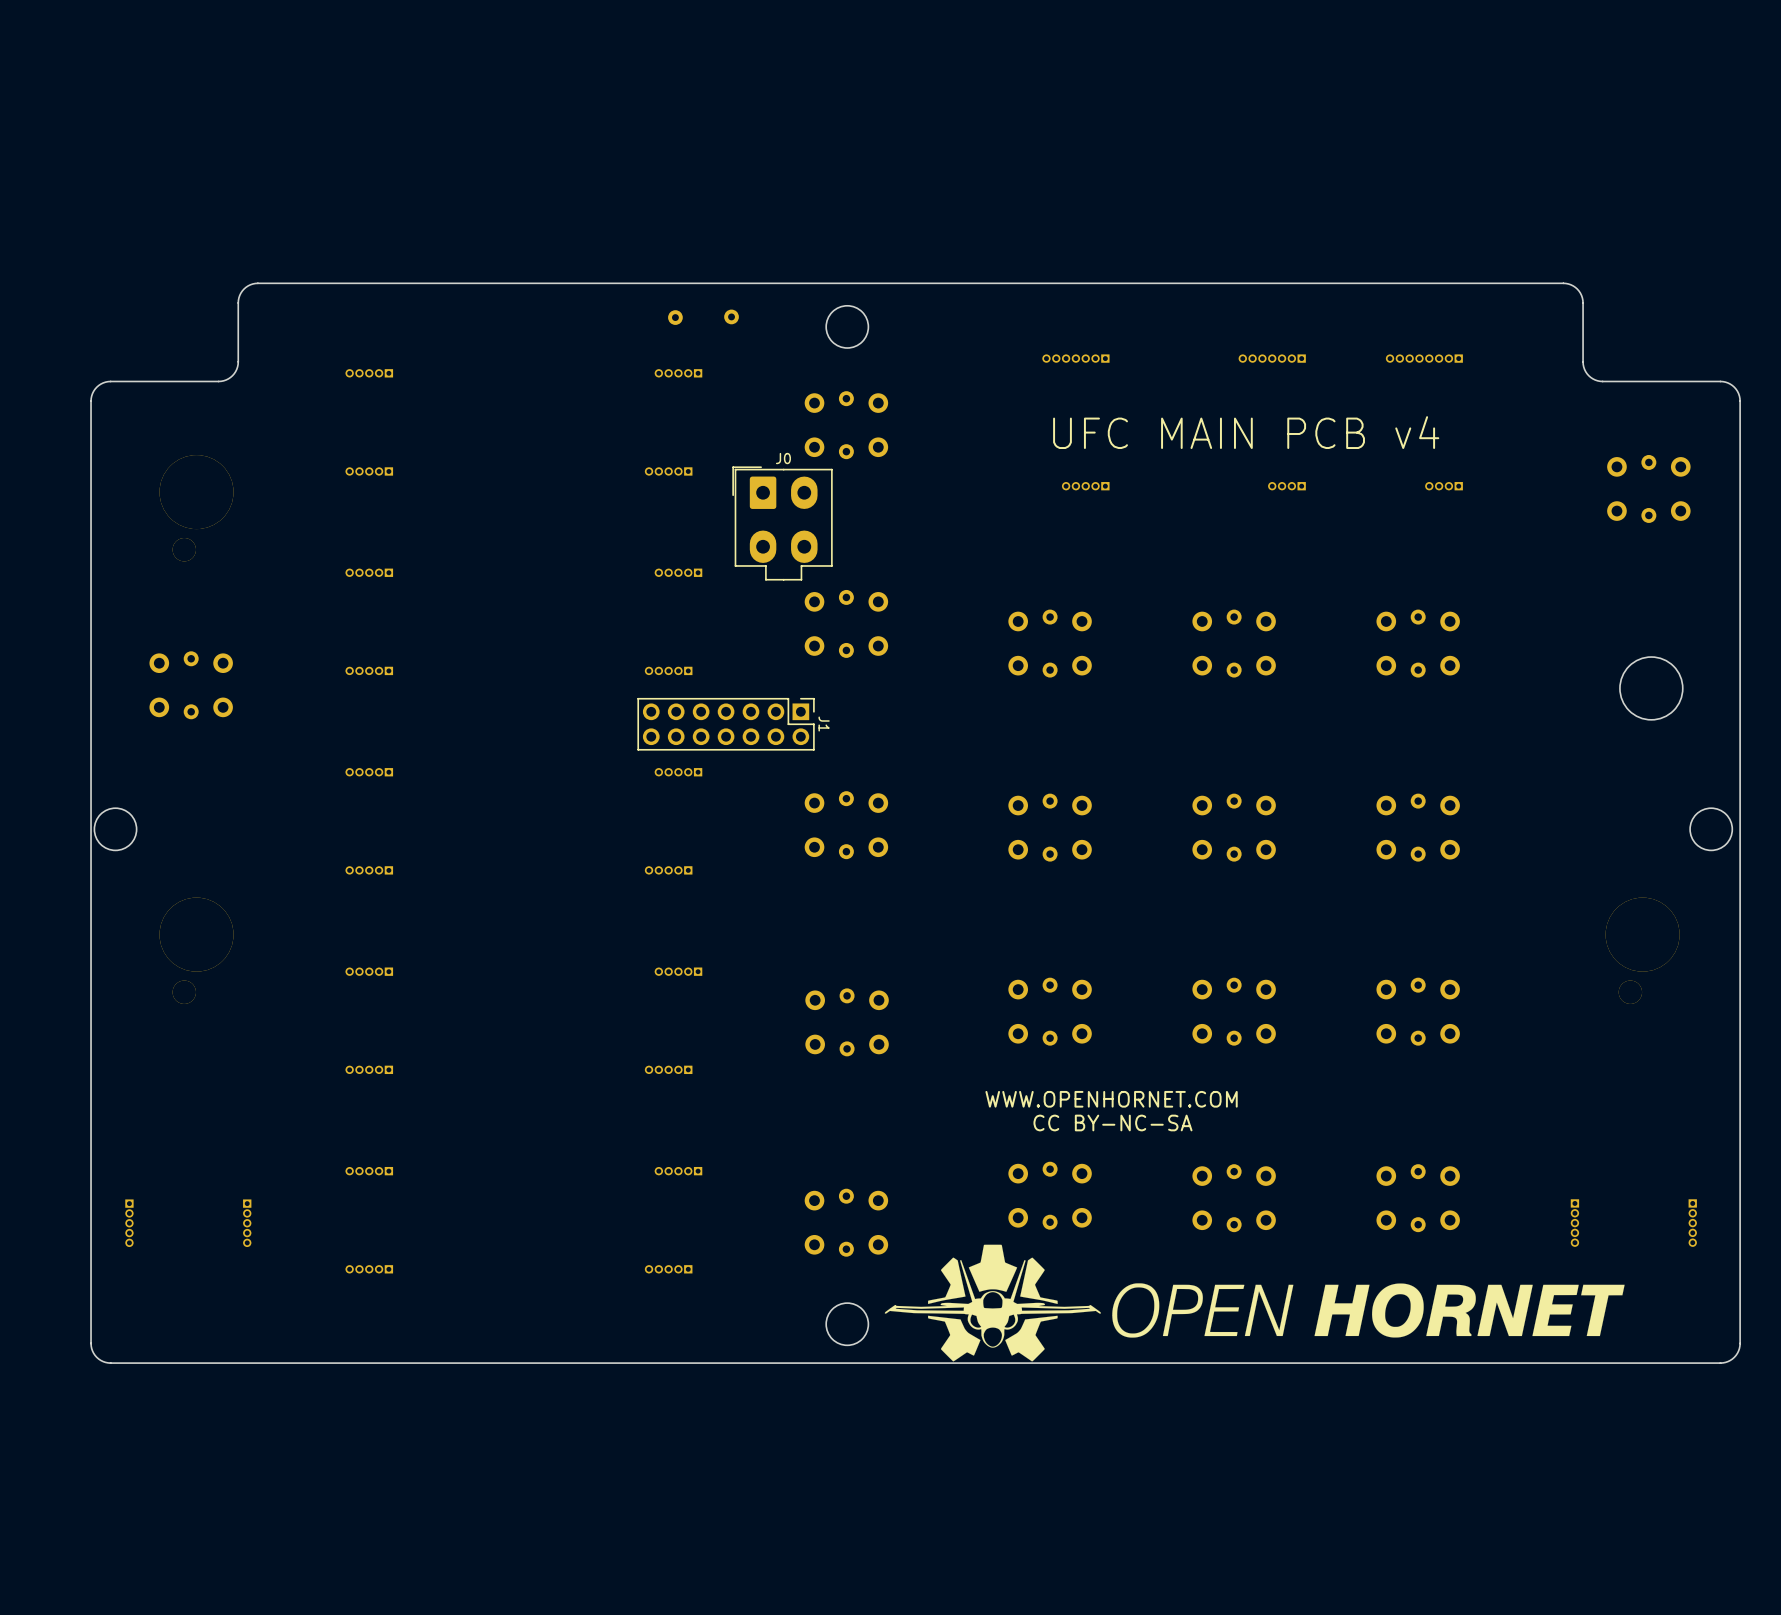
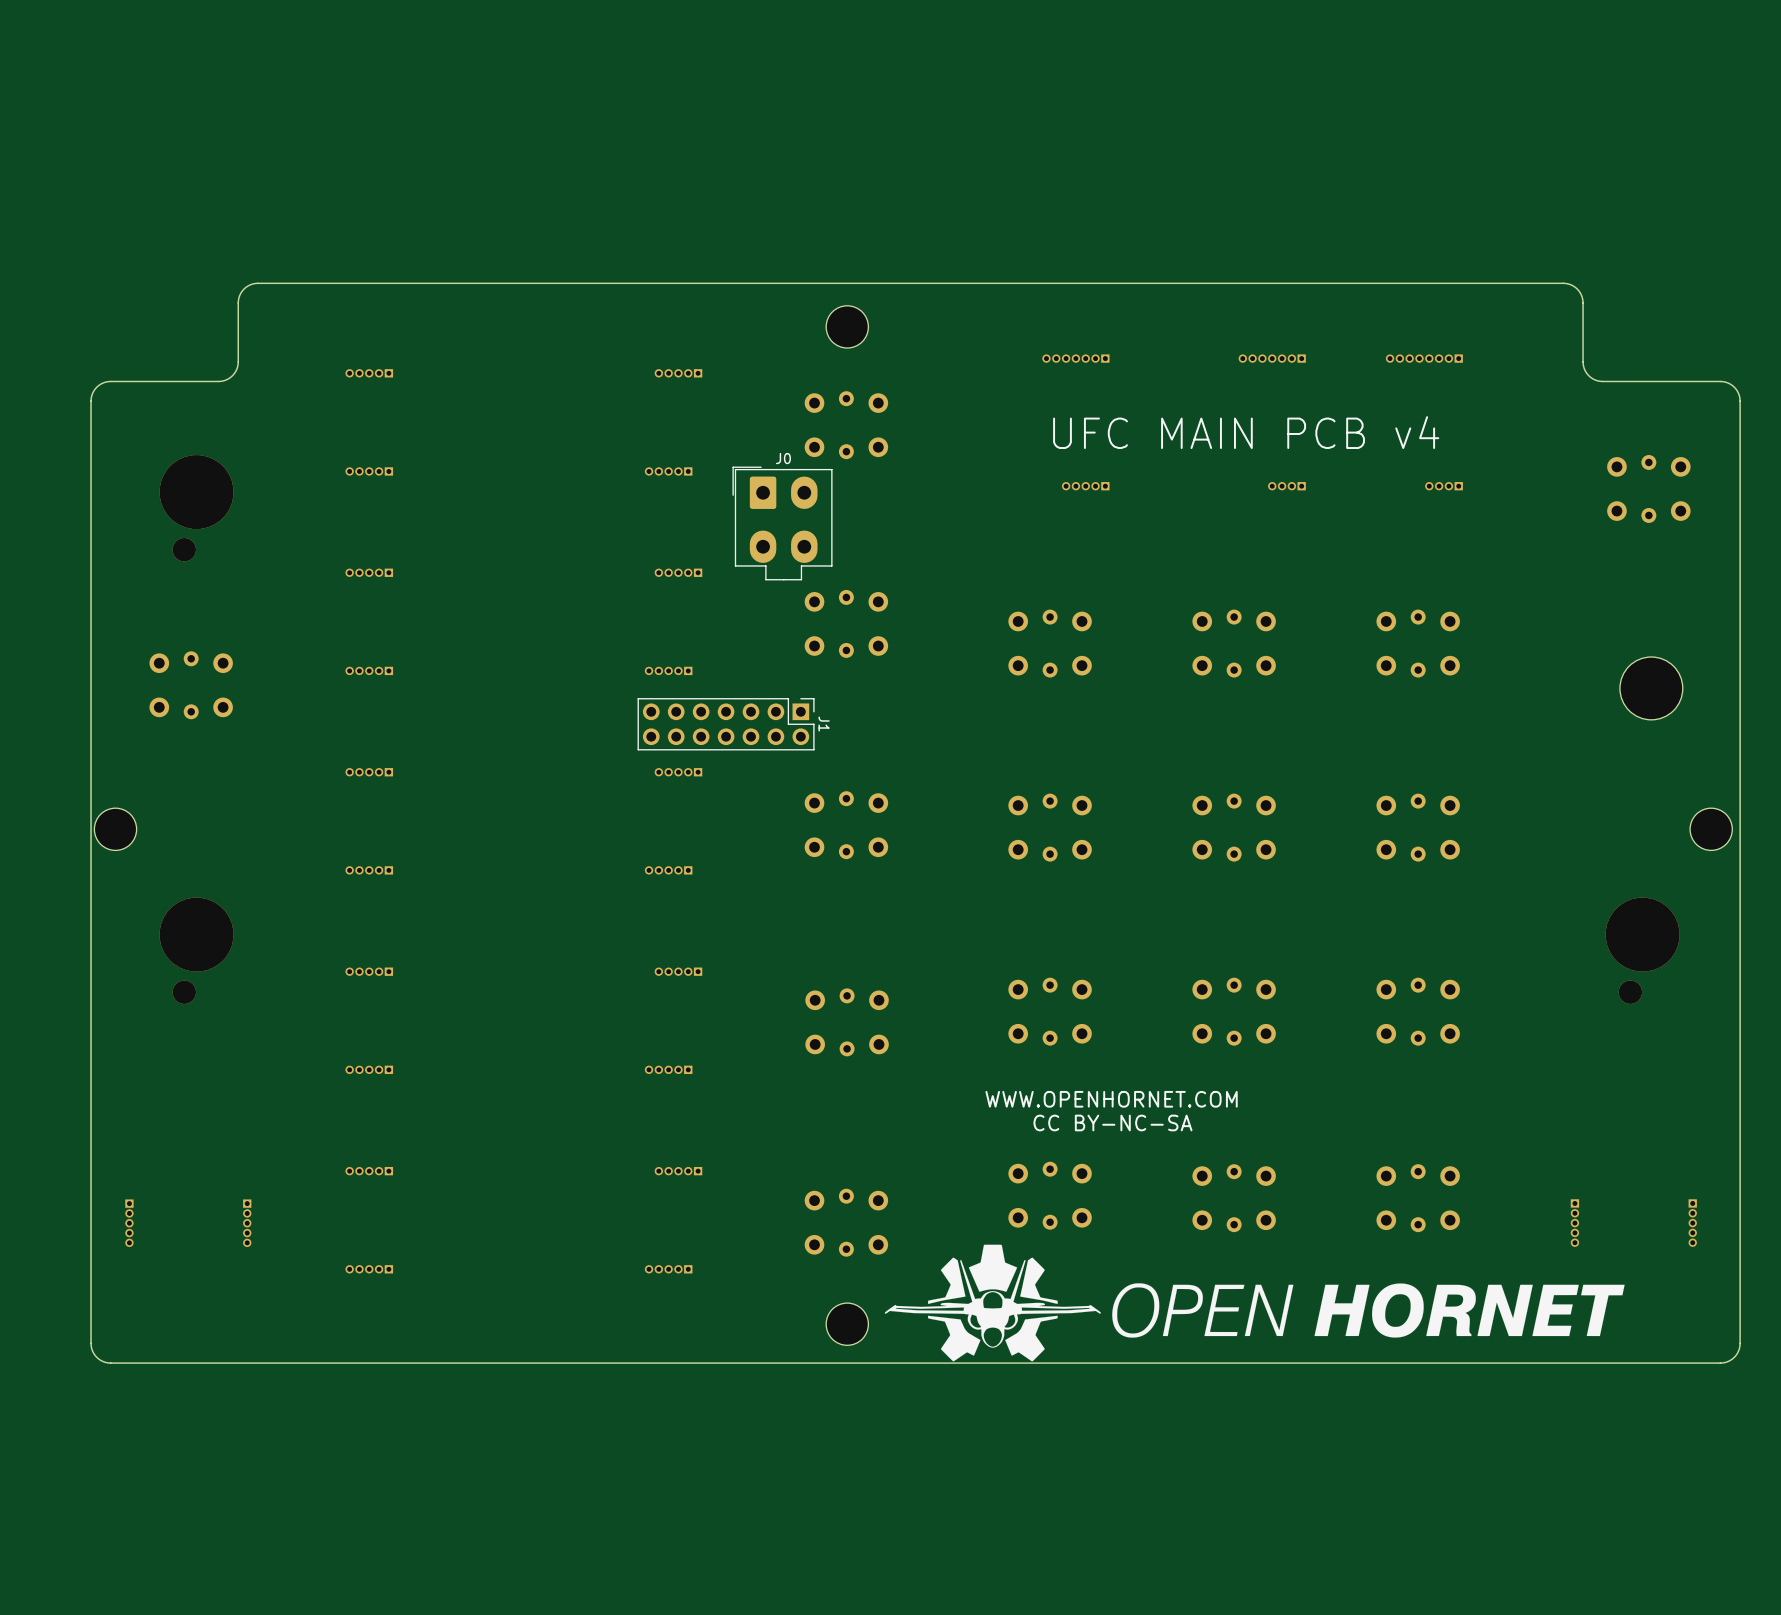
part: (731, 316) -> none
part: (675, 317) -> none

